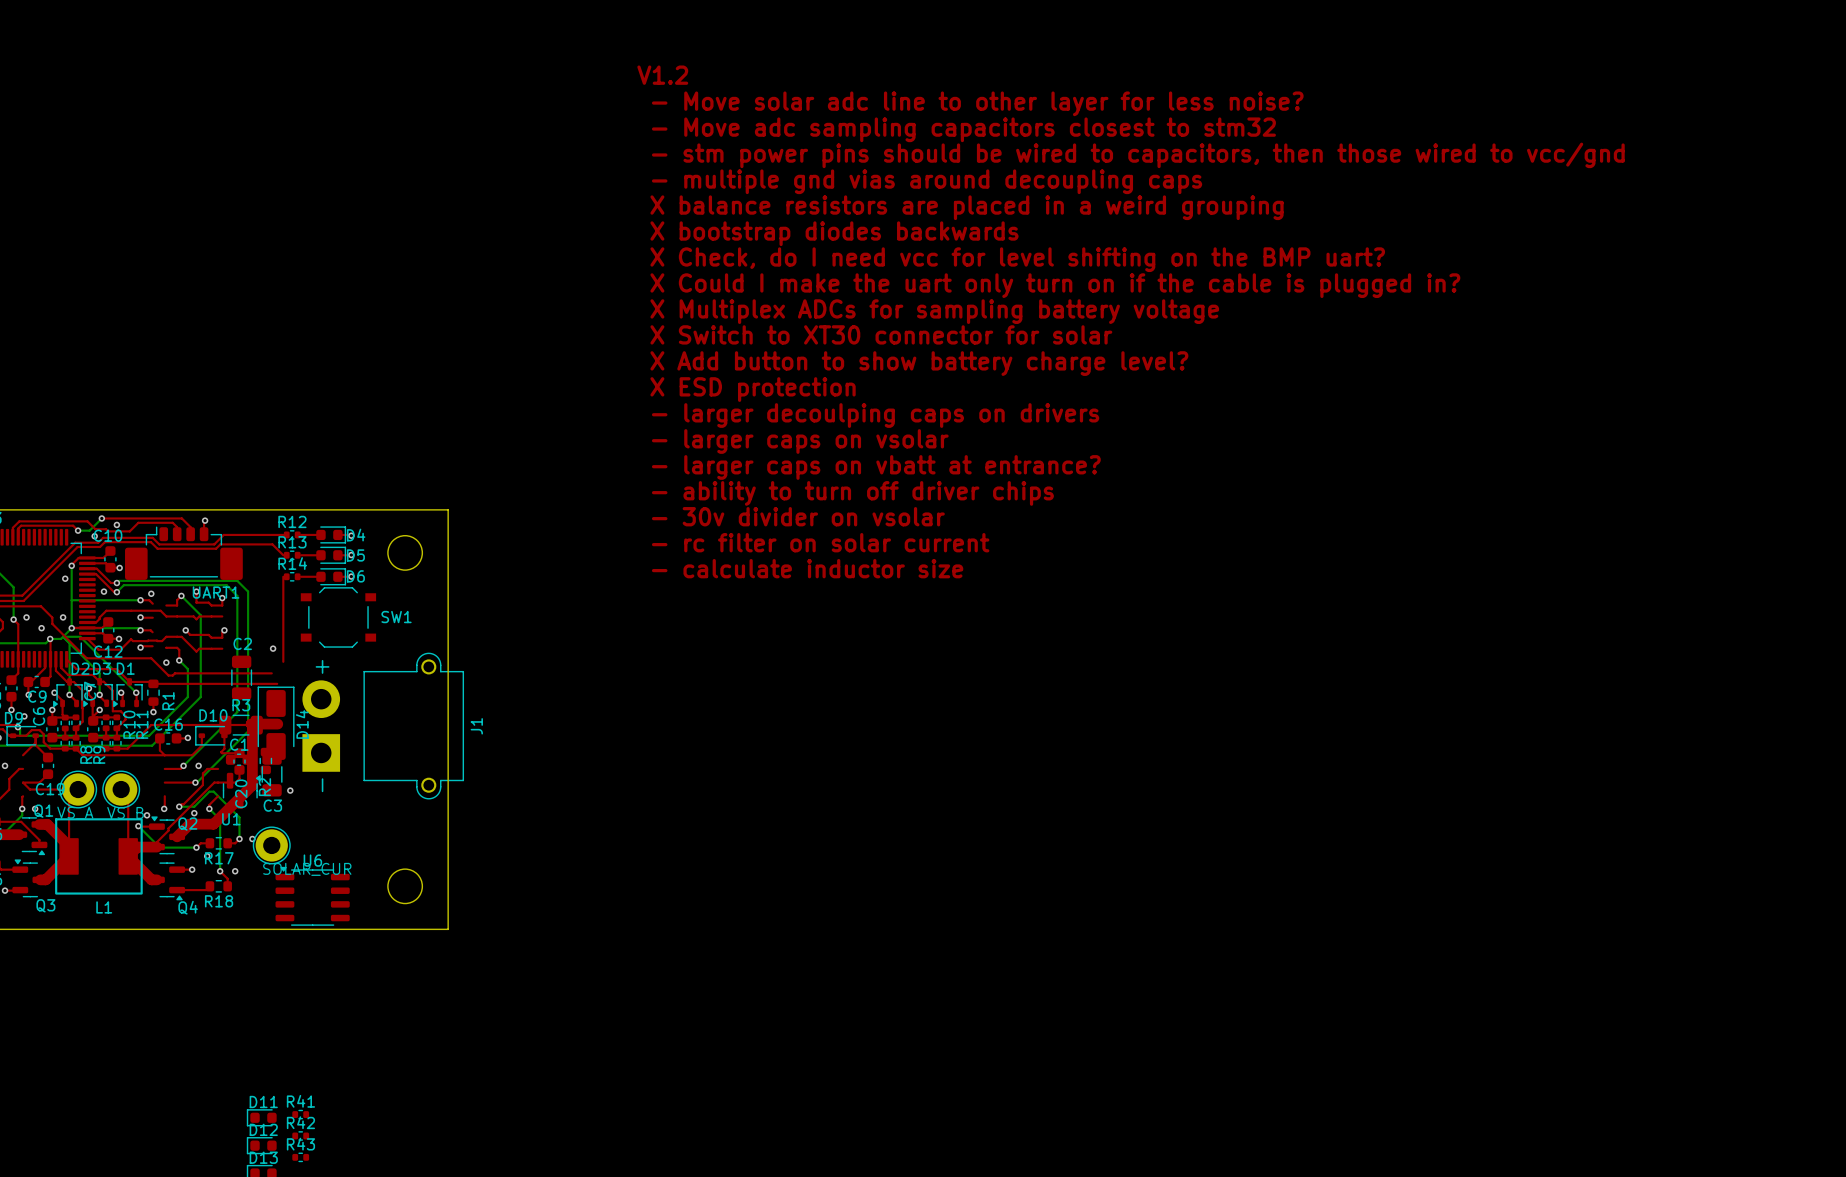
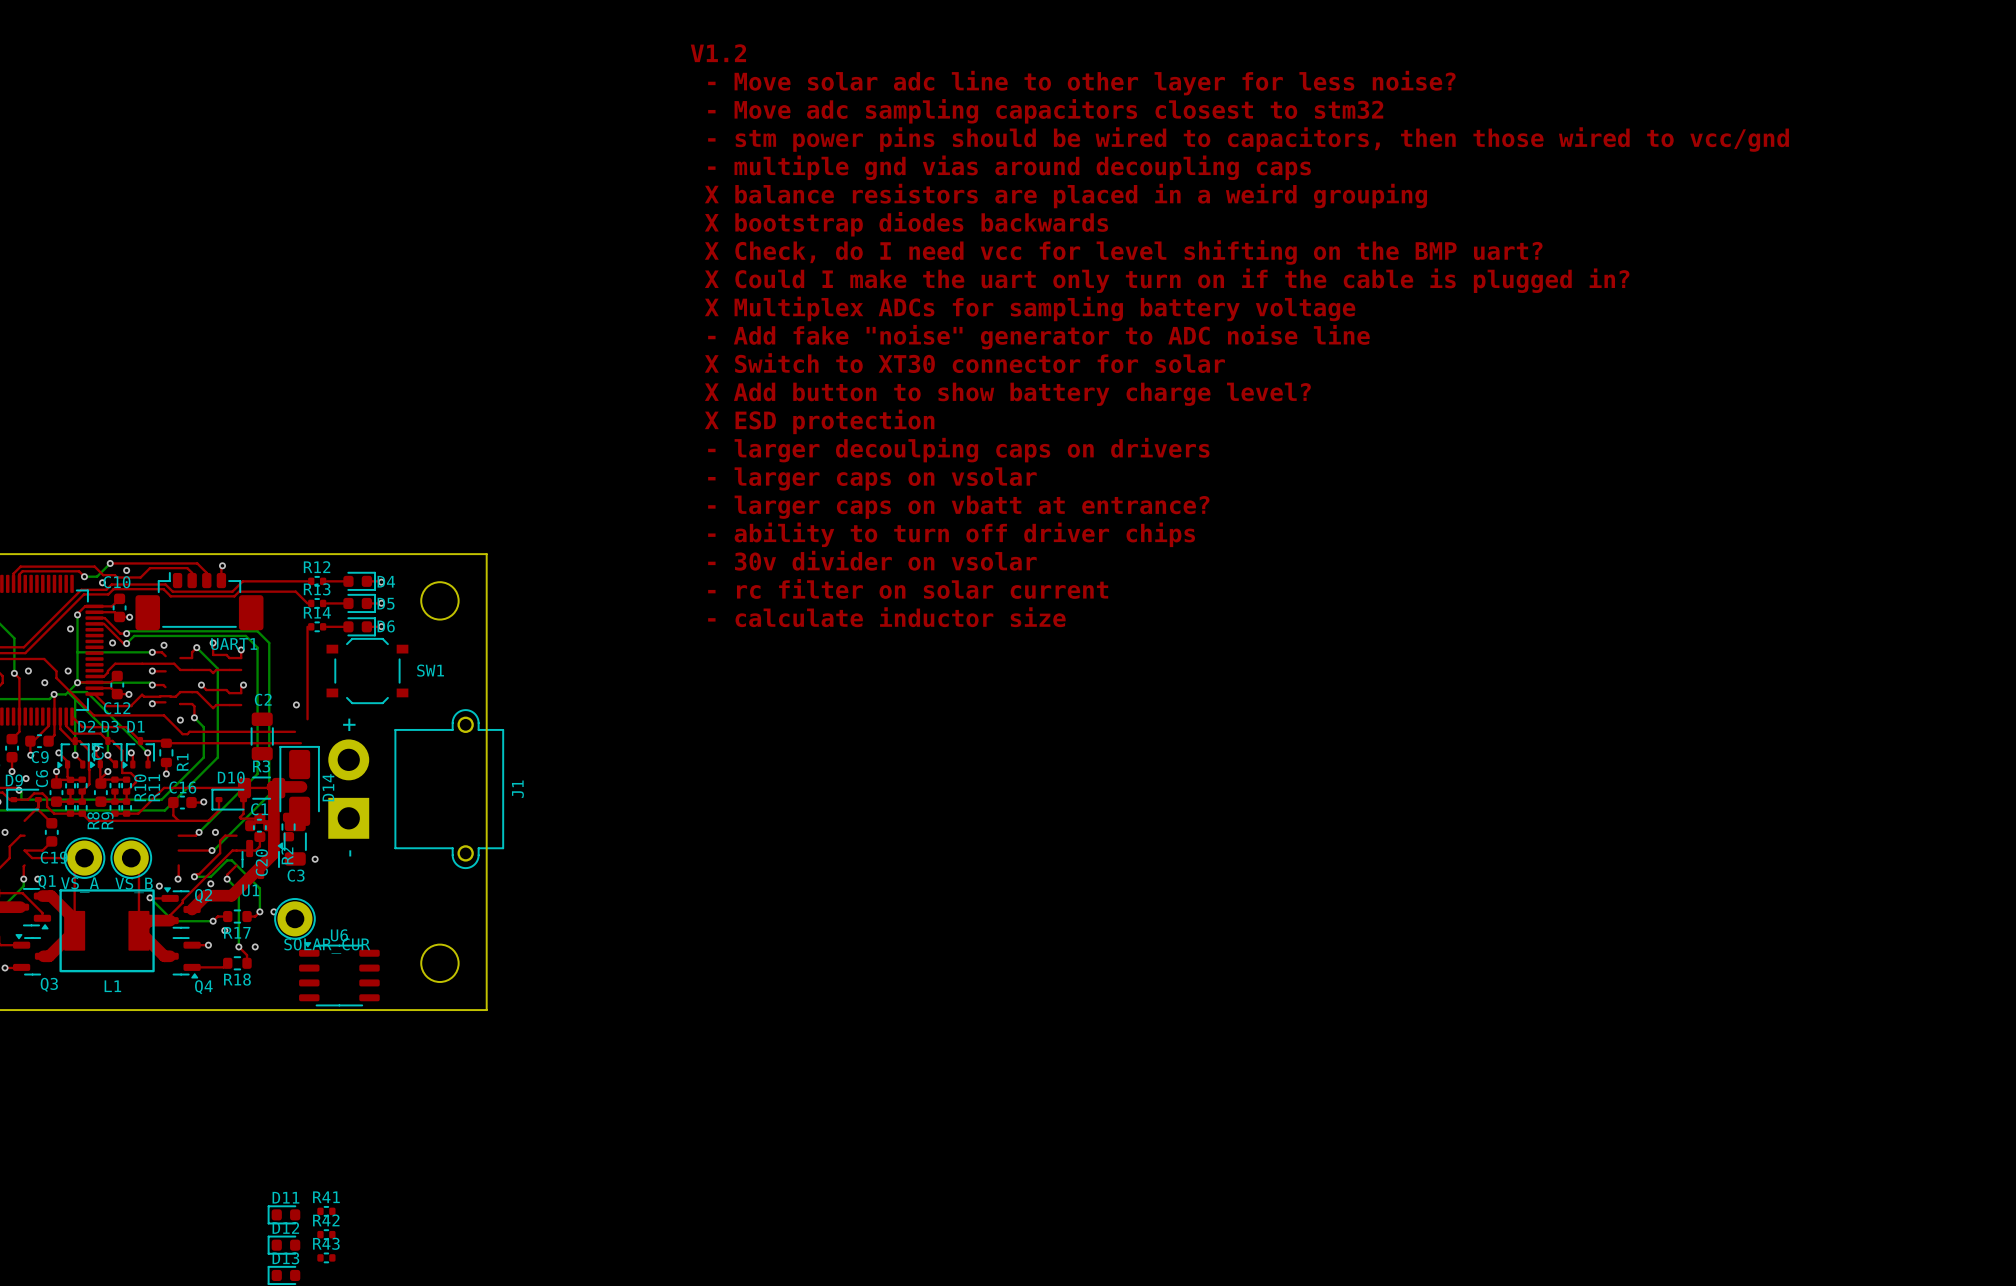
text: none -> V1.2 (718, 53)
text: V1.2 (662, 75) -> - Move solar adc line to other layer for less noise? (1081, 83)
text: - Move solar adc line to other layer for less noise? (977, 103) -> - Move adc sampling capacitors closest to stm32 (1045, 111)
text: - Move adc sampling capacitors closest to stm32 (963, 129) -> - stm power pins should be wired to capacitors, then those wired to vcc/gnd (1248, 139)
text: - stm power pins should be wired to capacitors, then those wired to vcc/gnd (1138, 155) -> - multiple gnd vias around decoupling caps (1009, 167)
text: - multiple gnd vias around decoupling caps (927, 181) -> X balance resistors are placed in a weird grouping (1065, 196)
text: X balance resistors are placed in a weird grouping (967, 207) -> X bootstrap diodes backwards (906, 224)
text: X bootstrap diodes backwards (834, 233) -> X Check, do I need vcc for level shifting on the BMP uart? (1123, 252)
text: X Check, do I need vcc for level shifting on the BMP uart? (1017, 259) -> X Could I make the uart only turn on if the cable is plugged in? (1167, 280)
text: X Could I make the uart only turn on if the cable is plugged in? (1055, 285) -> X Multiplex ADCs for sampling battery voltage (1030, 308)
text: X Multiplex ADCs for sampling battery voltage (934, 311) -> - Add fake "noise" generator to ADC noise line (1038, 337)

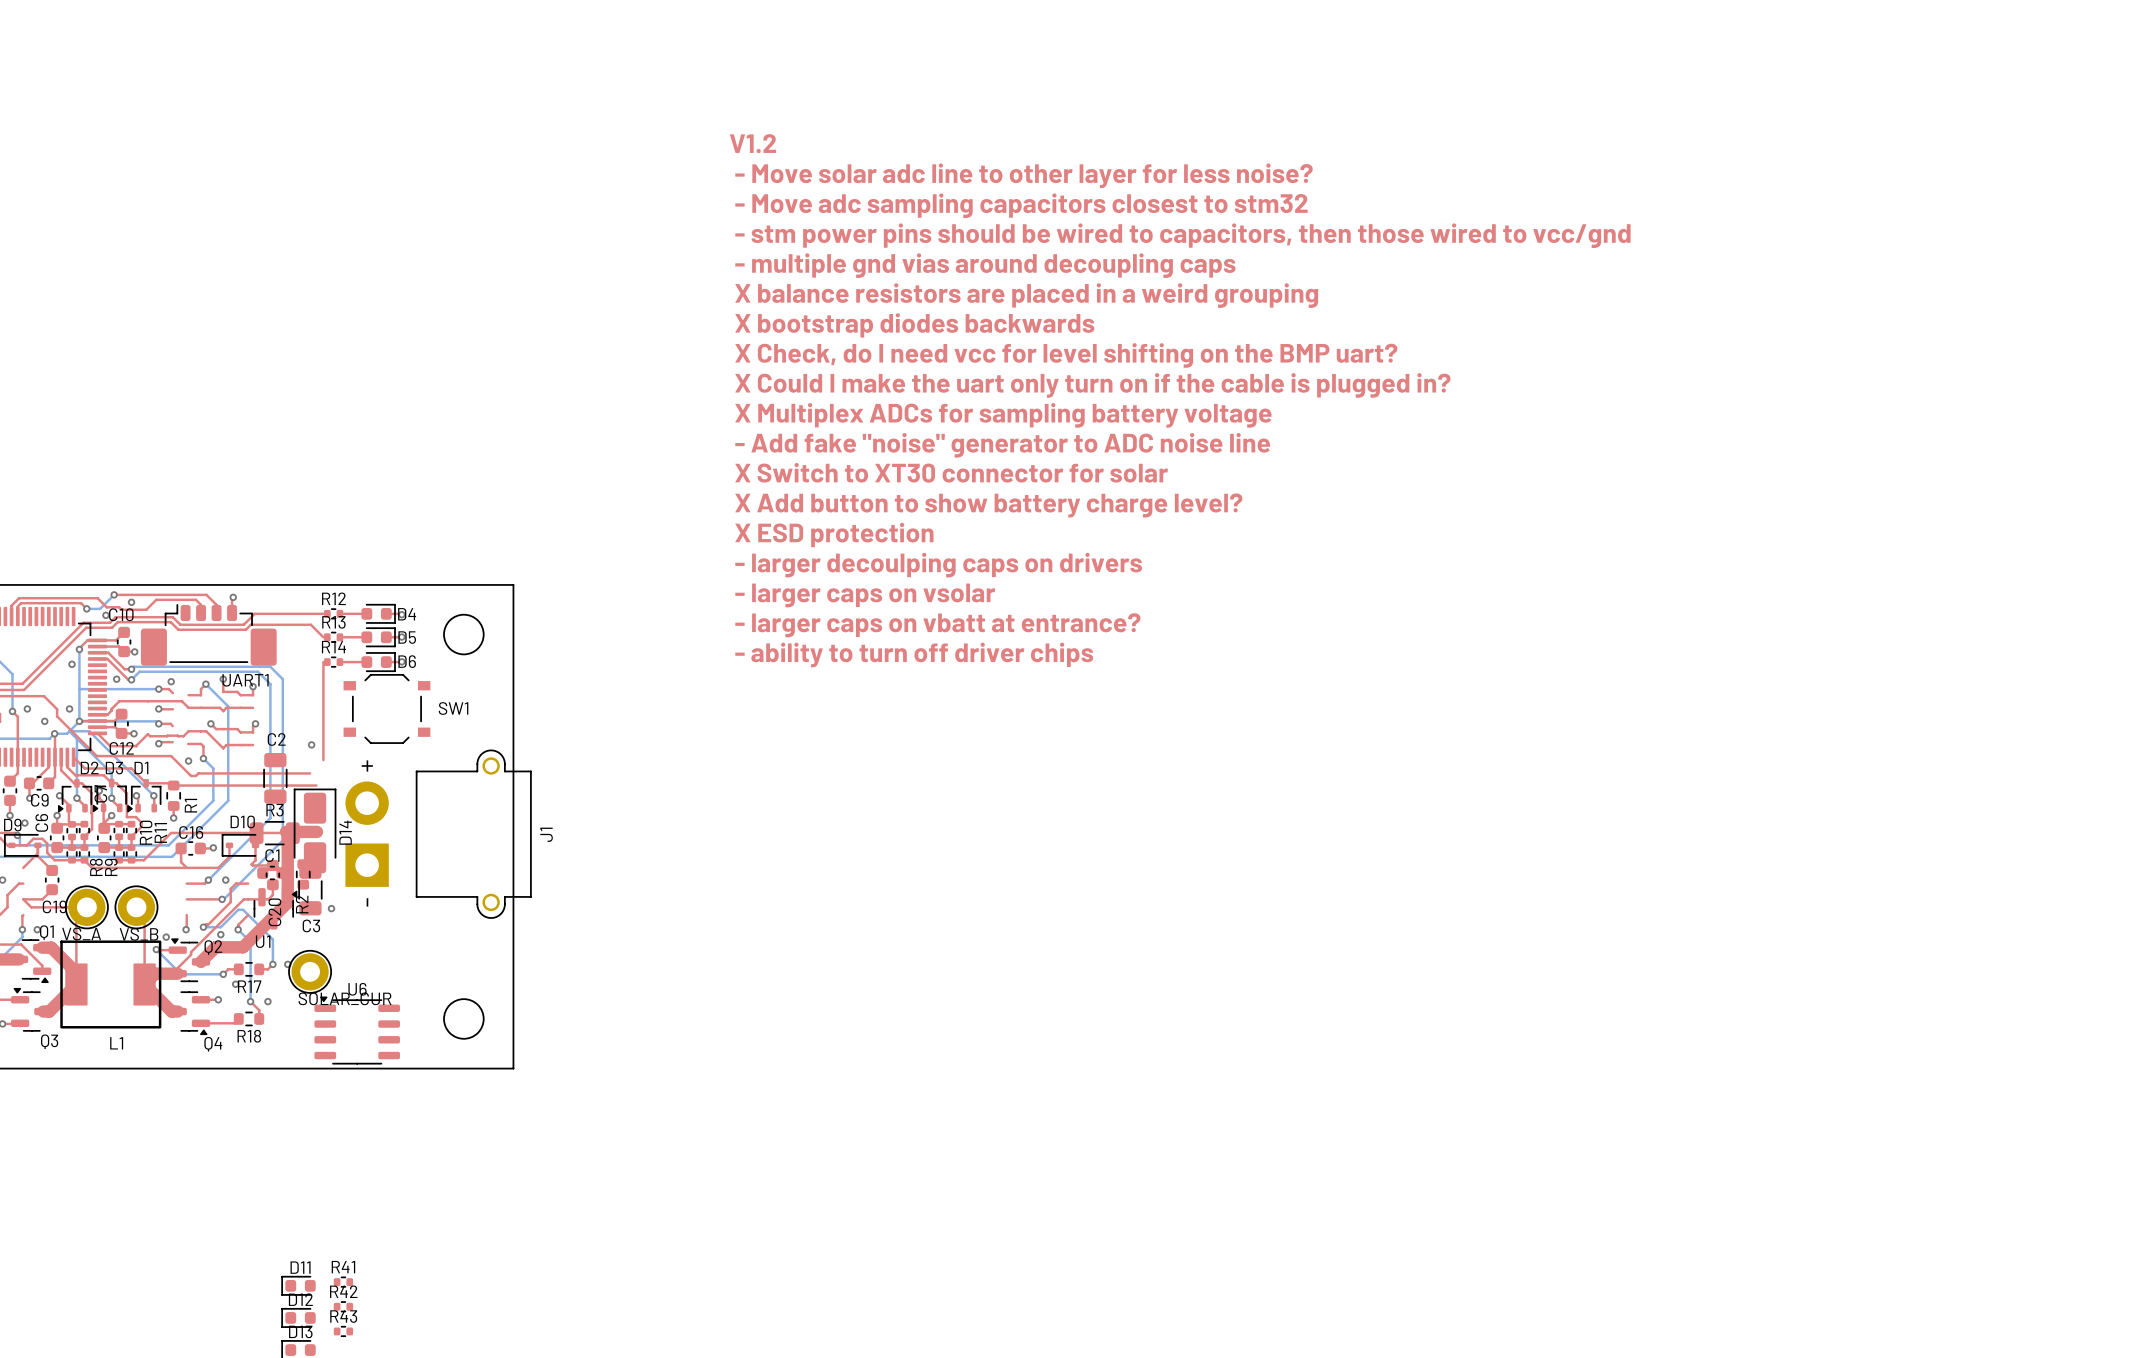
text: V1.2 (718, 53) -> none
text: - Move solar adc line to other layer for less noise? (1081, 83) -> none
text: - Move adc sampling capacitors closest to stm32 (1045, 111) -> none
text: - stm power pins should be wired to capacitors, then those wired to vcc/gnd (1248, 139) -> V1.2 (753, 143)
text: - multiple gnd vias around decoupling caps (1009, 167) -> - Move solar adc line to other layer for less noise? (1024, 175)
text: X balance resistors are placed in a weird grouping (1065, 196) -> - Move adc sampling capacitors closest to stm32 (1021, 205)
text: X bootstrap diodes backwards (906, 224) -> - stm power pins should be wired to capacitors, then those wired to vcc/gnd (1182, 235)
text: X Check, do I need vcc for level shifting on the BMP uart? (1123, 252) -> - multiple gnd vias around decoupling caps (985, 265)
text: X Could I make the uart only turn on if the cable is plugged in? (1167, 280) -> X balance resistors are placed in a weird grouping (1026, 295)
text: X Multiplex ADCs for sampling battery voltage (1030, 308) -> X bootstrap diodes backwards (914, 325)
text: - Add fake "noise" generator to ADC noise line (1038, 337) -> X Check, do I need vcc for level shifting on the BMP uart? (1066, 355)
text: X Switch to XT30 connector for solar (964, 363) -> X Could I make the uart only turn on if the cable is plugged in? (1092, 385)
text: X Add button to show battery charge level? (1007, 394) -> X Multiplex ADCs for sampling battery voltage (1003, 415)
text: X ESD protection (819, 421) -> - Add fake "noise" generator to ADC noise line (1002, 445)
text: - larger decoulping caps on drivers (958, 450) -> X Switch to XT30 connector for solar (951, 472)
text: - larger caps on vsolar (872, 478) -> X Add button to show battery charge level? (988, 505)
text: - larger caps on vbatt at entrance? (958, 507) -> X ESD protection (834, 535)
text: - ability to turn off driver chips (951, 534) -> - larger decoulping caps on drivers (938, 565)
text: - 30v divider on vsolar (872, 560) -> - larger caps on vsolar (865, 595)
text: - rc filter on solar current (908, 588) -> - larger caps on vbatt at entrance? (937, 625)
text: - calculate inductor size (886, 617) -> - ability to turn off driver chips (914, 654)

